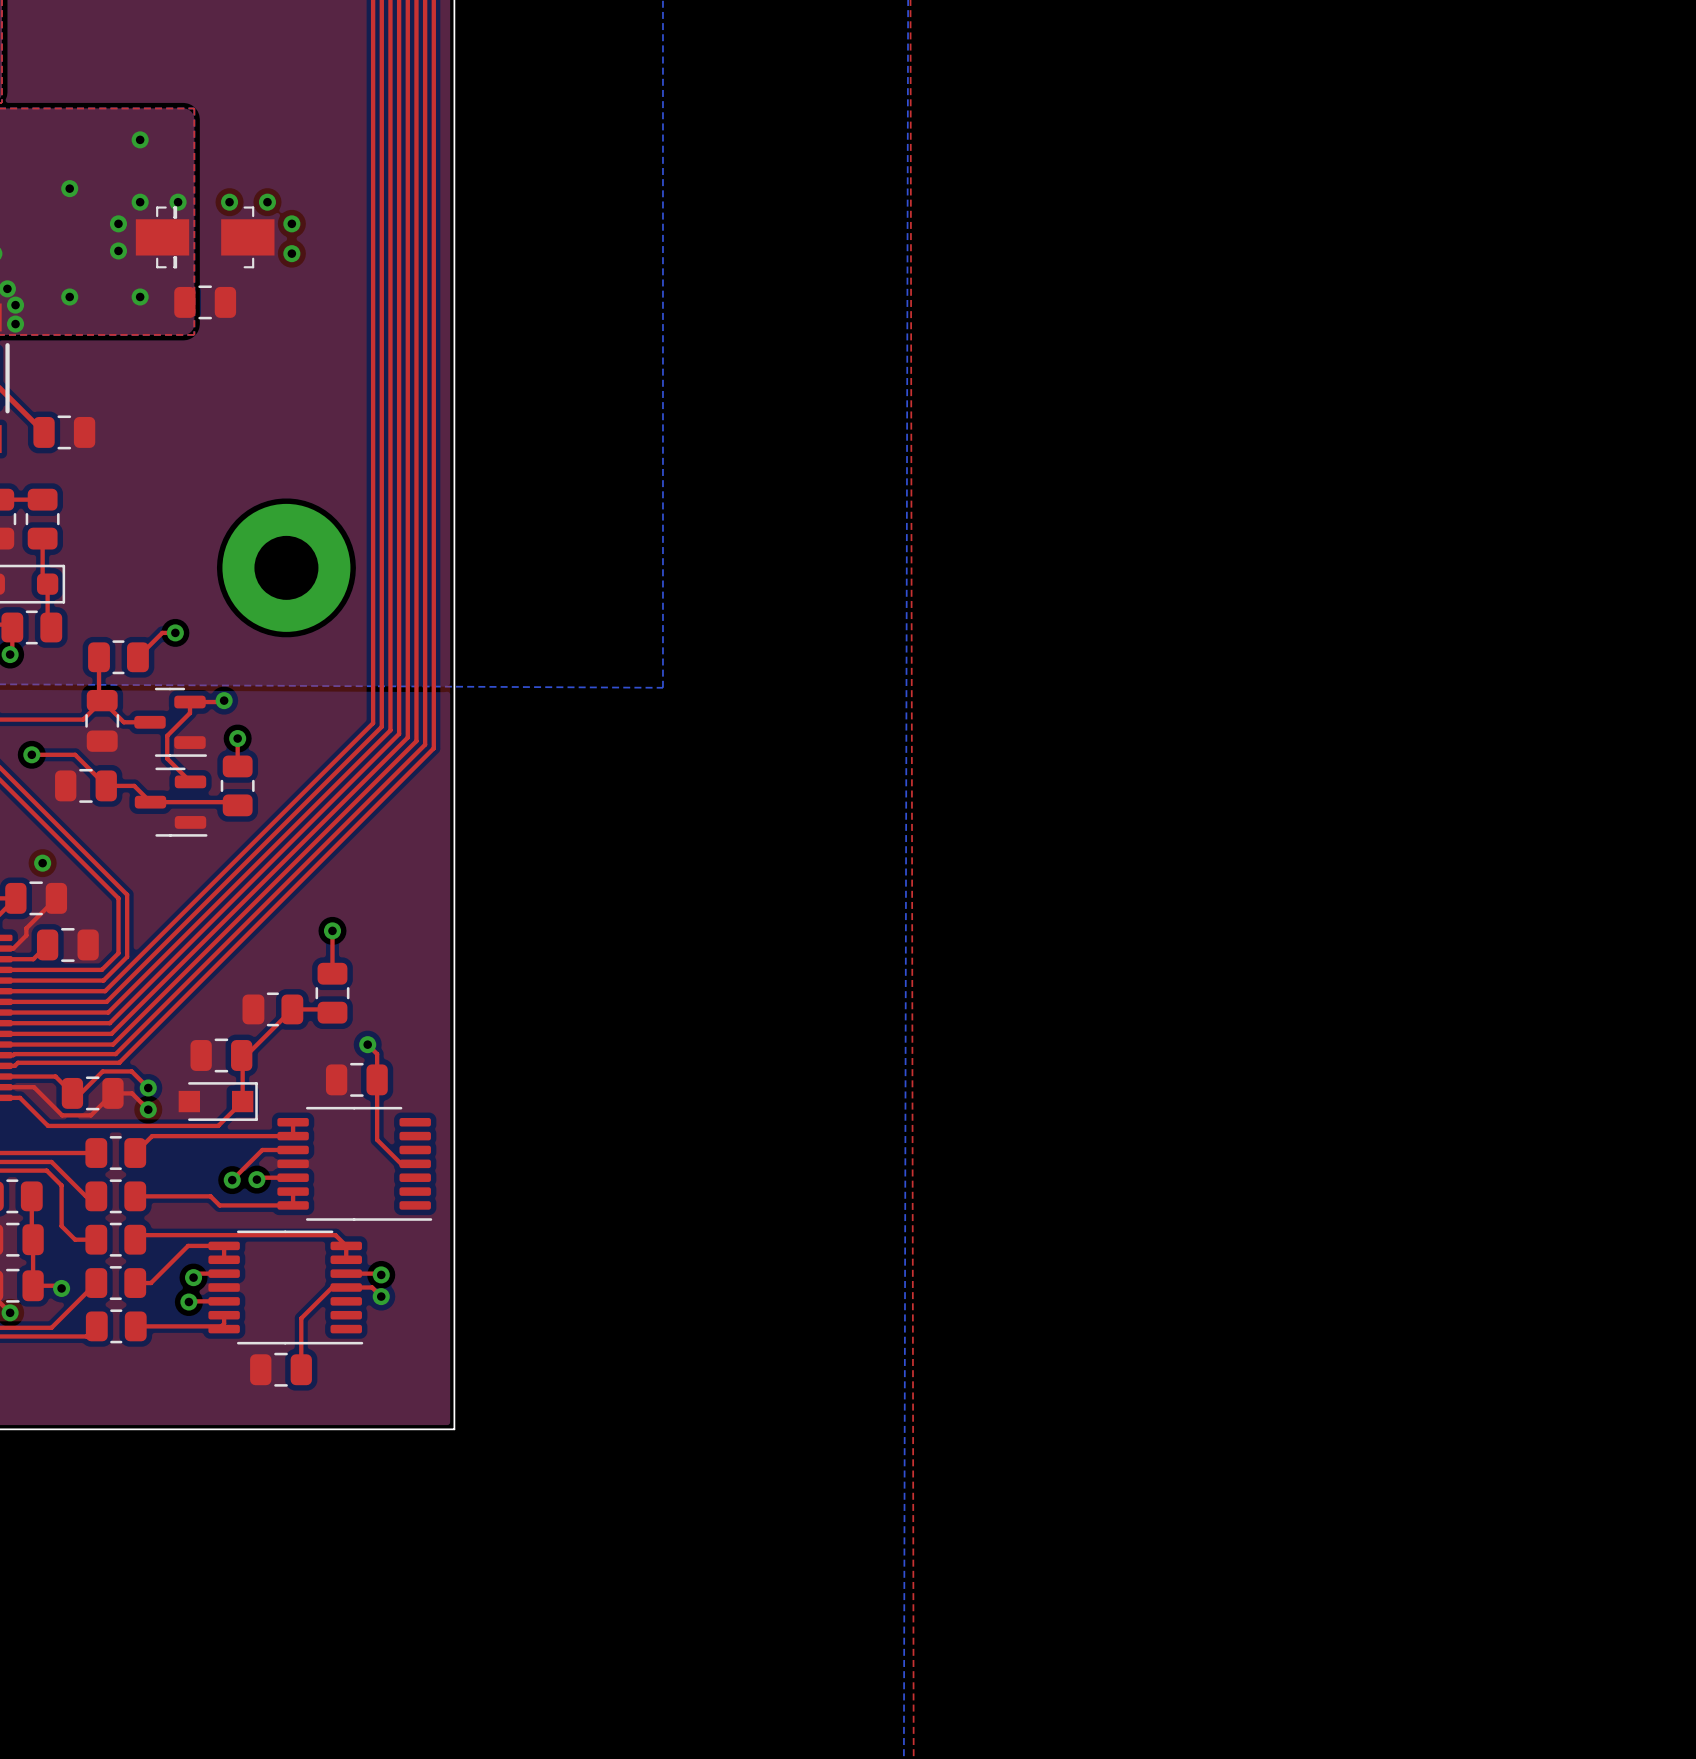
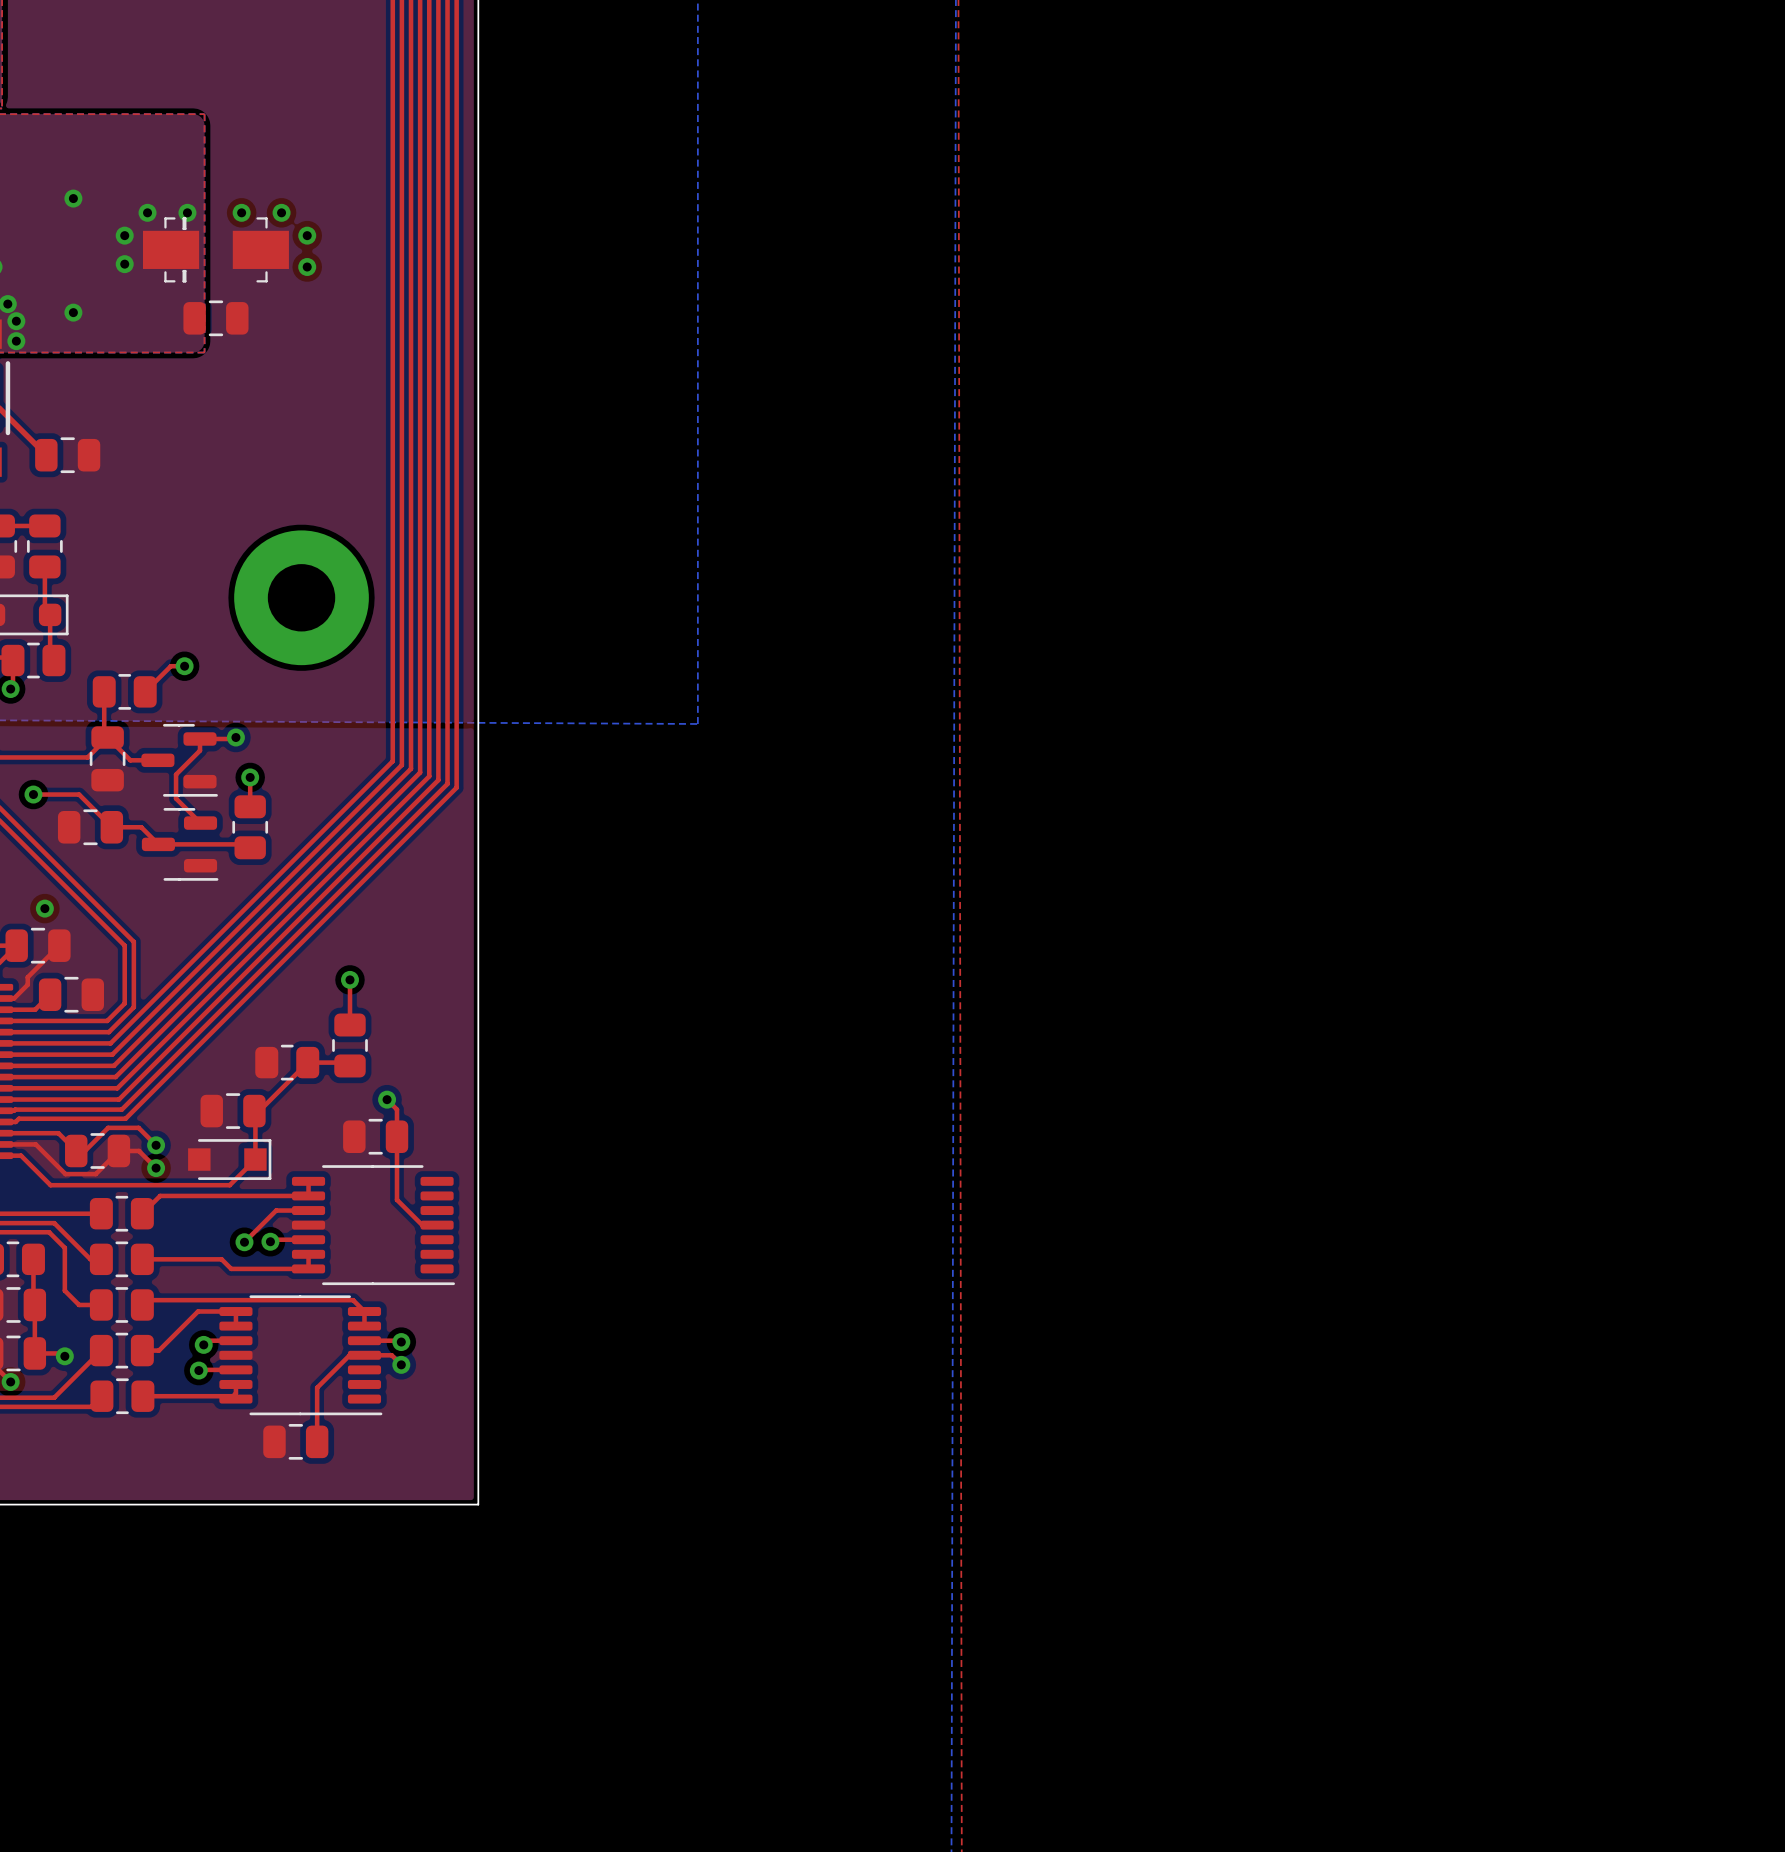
via: (140, 139) -> none
via: (140, 296) -> none

